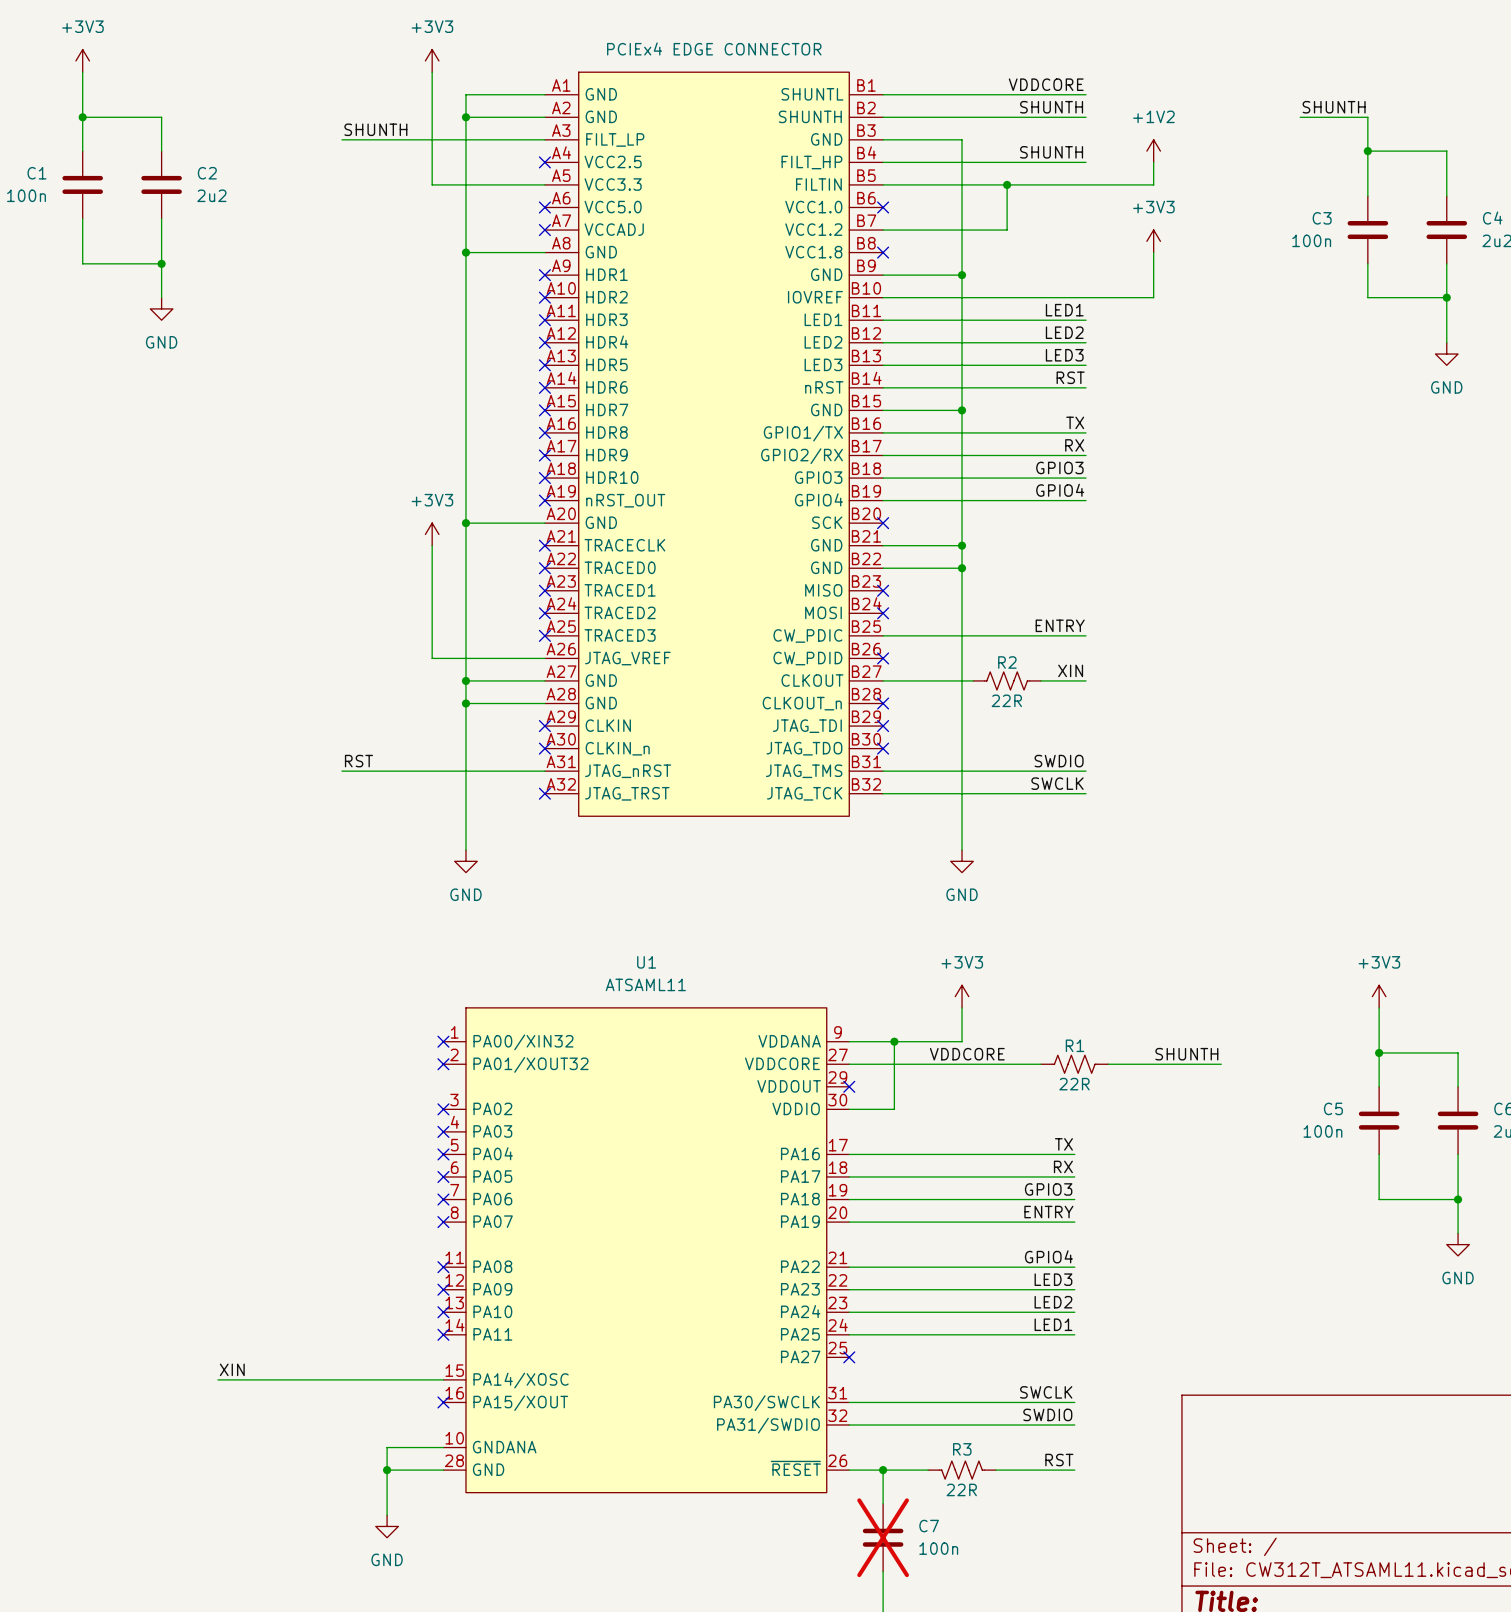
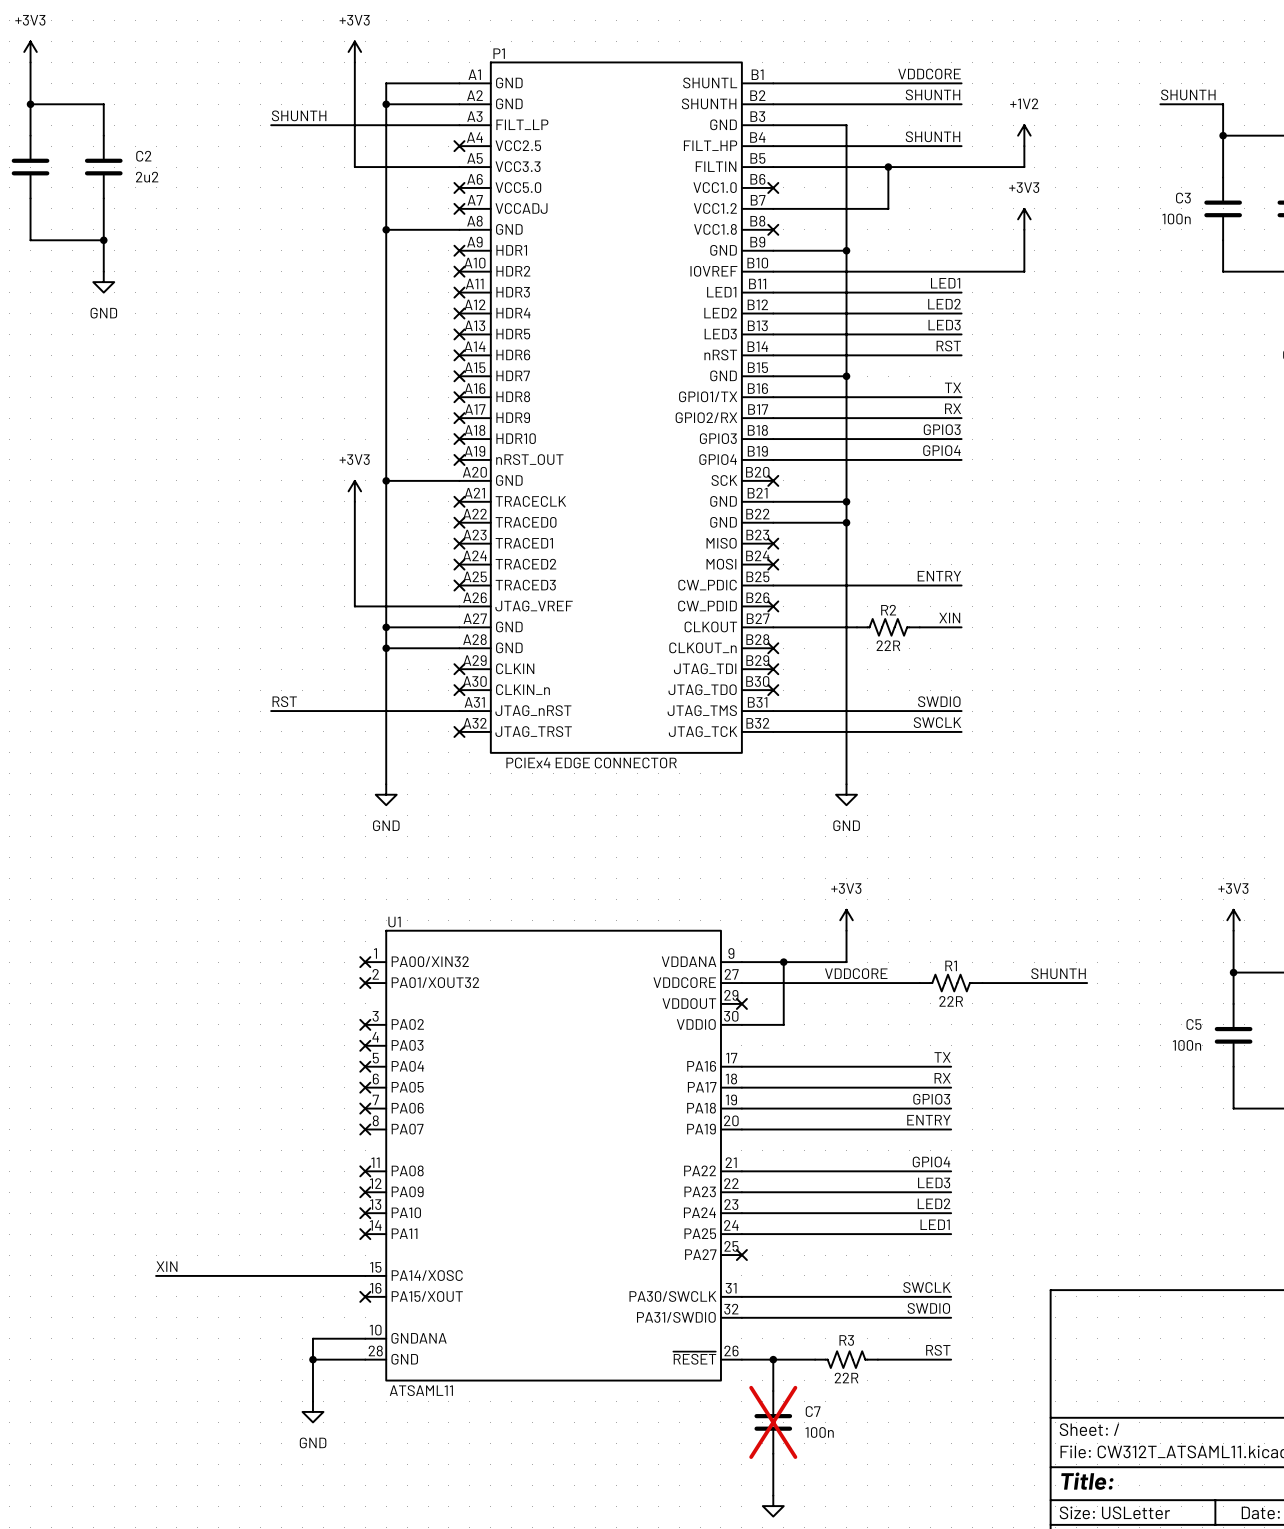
P1 value position: PCIEx4 EDGE CONNECTOR (714, 48) -> PCIEx4 EDGE CONNECTOR (591, 762)
P1 name: none -> P1 (499, 53)
U1 name position: U1 (646, 962) -> U1 (394, 922)
U1 text position: ATSAML11 (645, 984) -> ATSAML11 (421, 1390)

